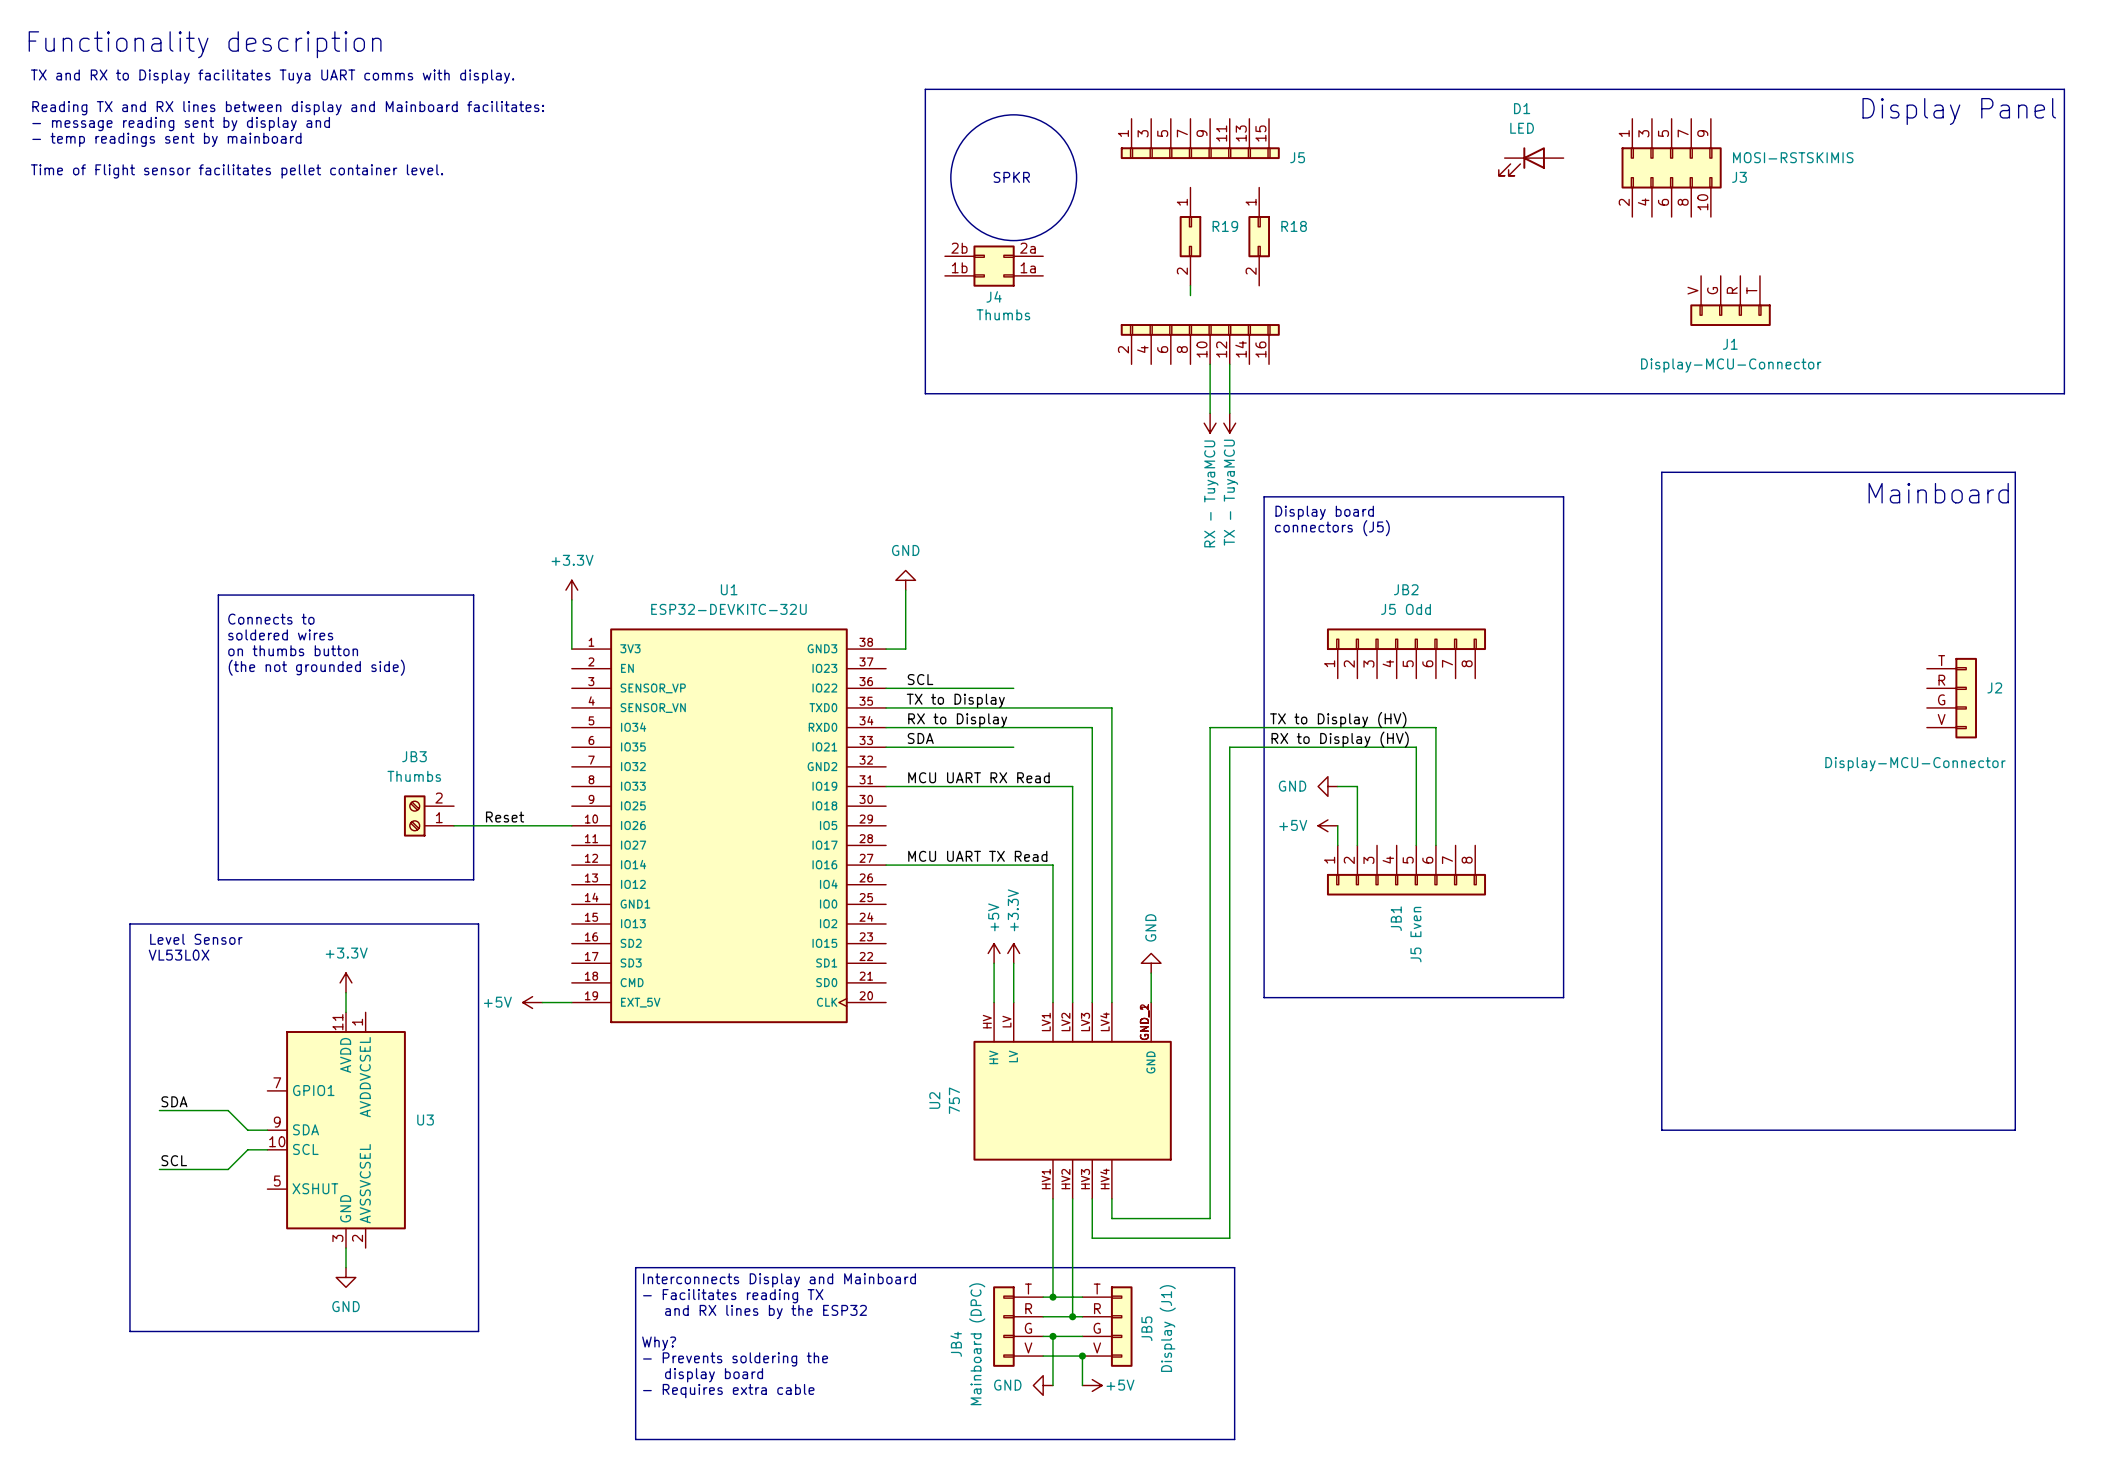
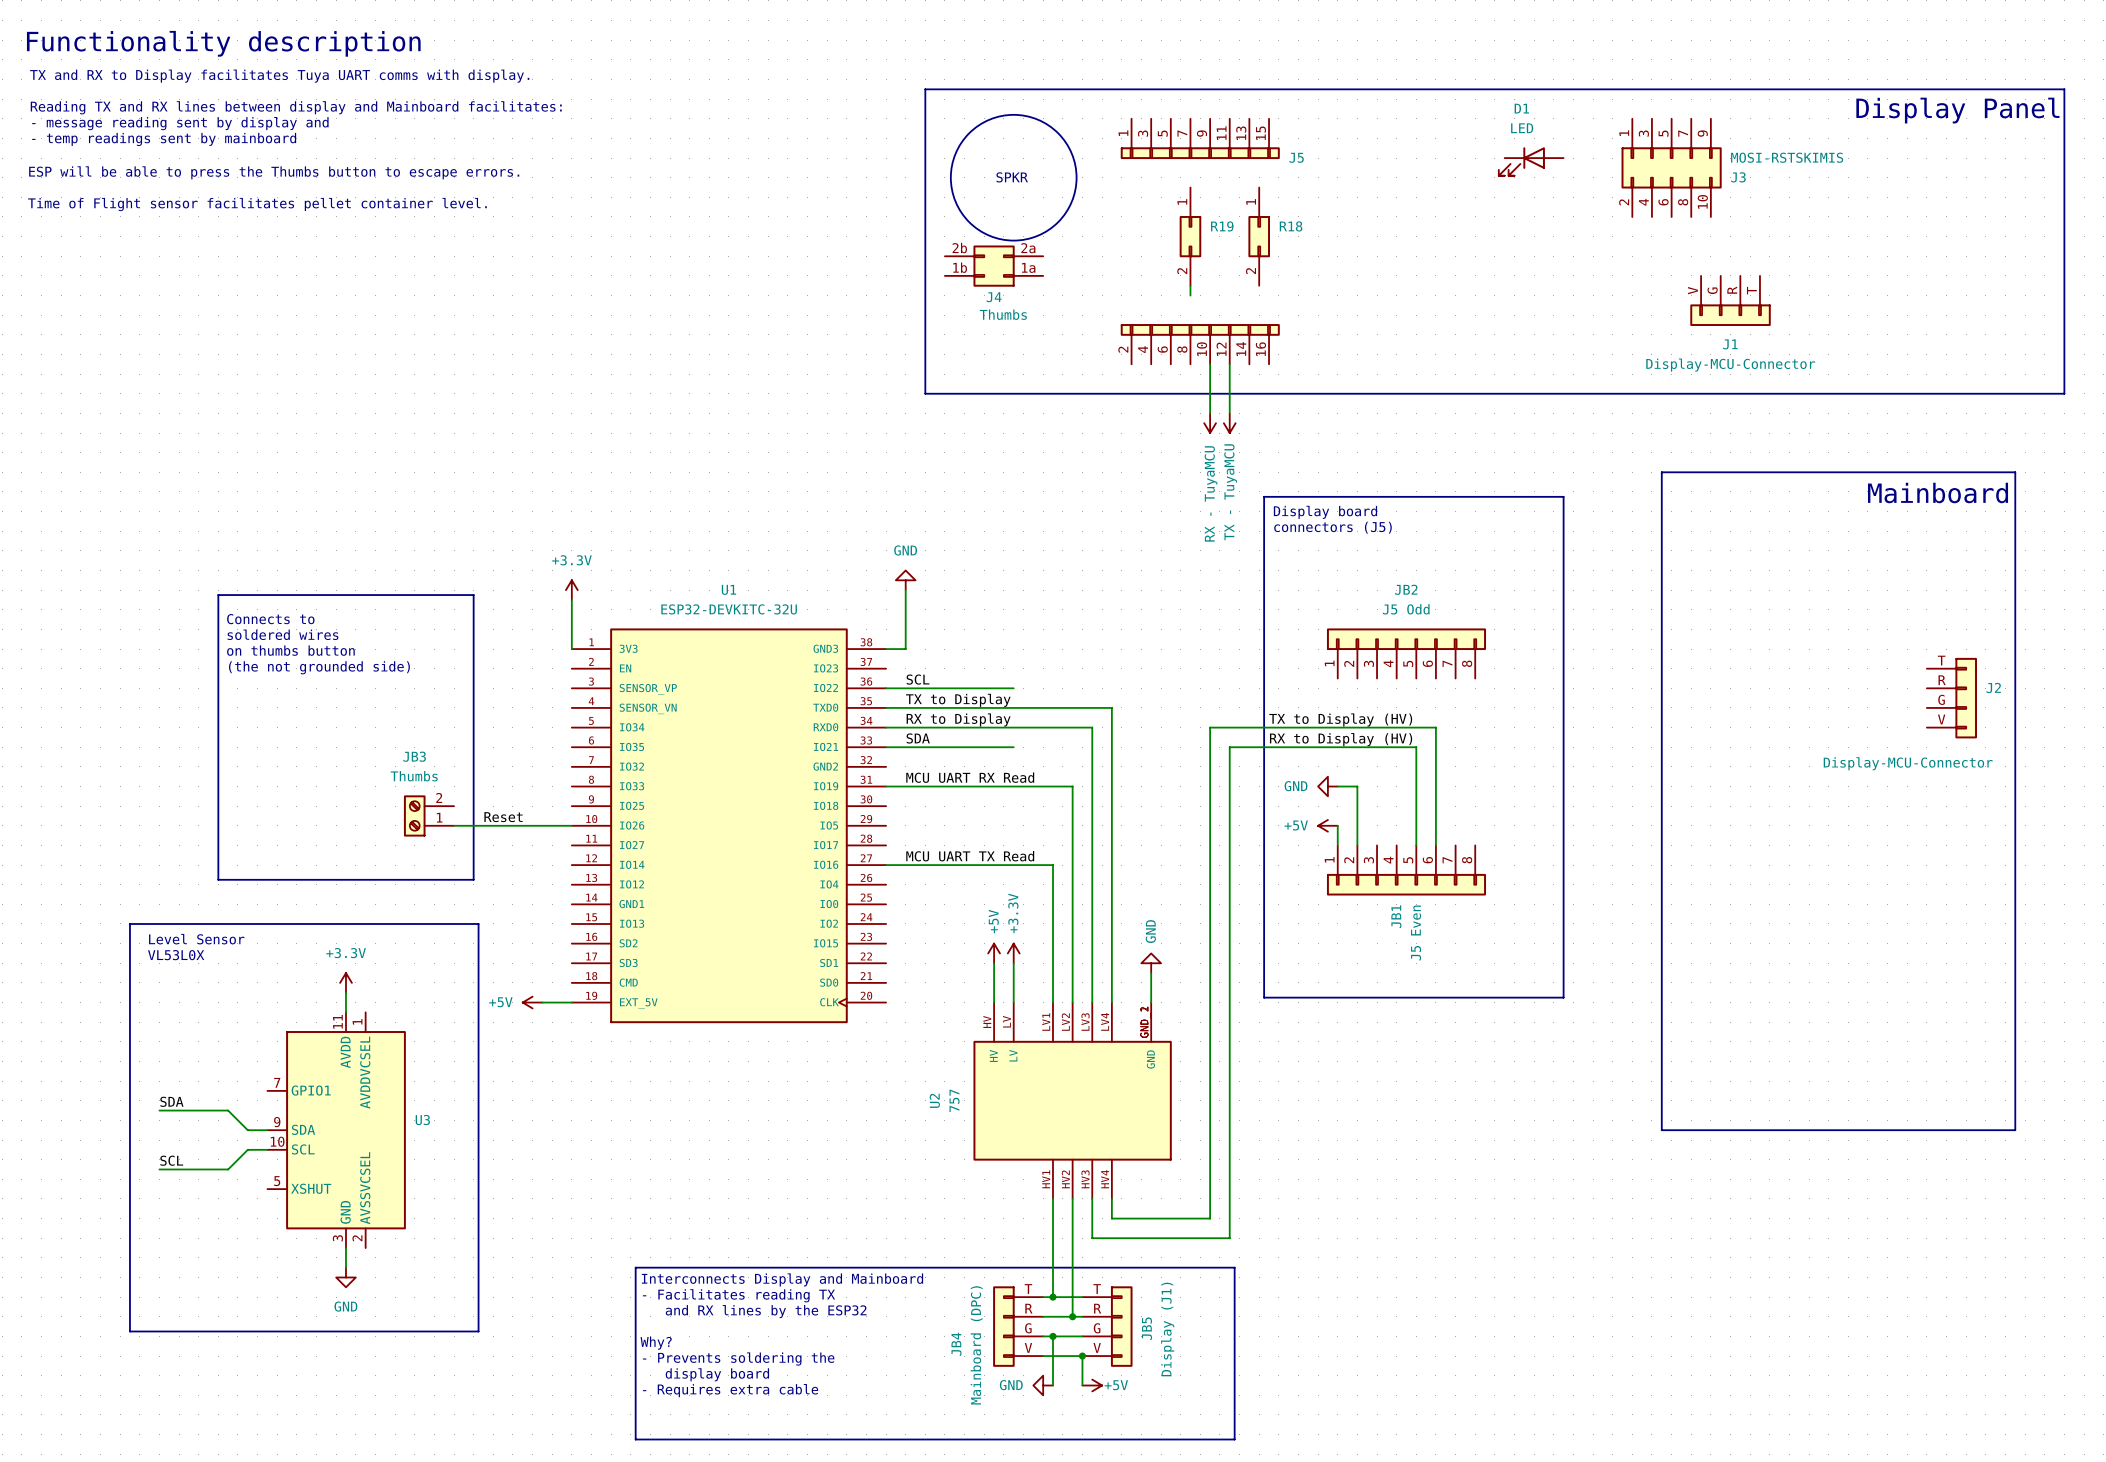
text position: Time of Flight sensor facilitates pellet container level. (237, 171) -> Time of Flight sensor facilitates pellet container level. (257, 204)
text: none -> ESP will be able to press the Thumbs button to escape errors. (274, 172)

